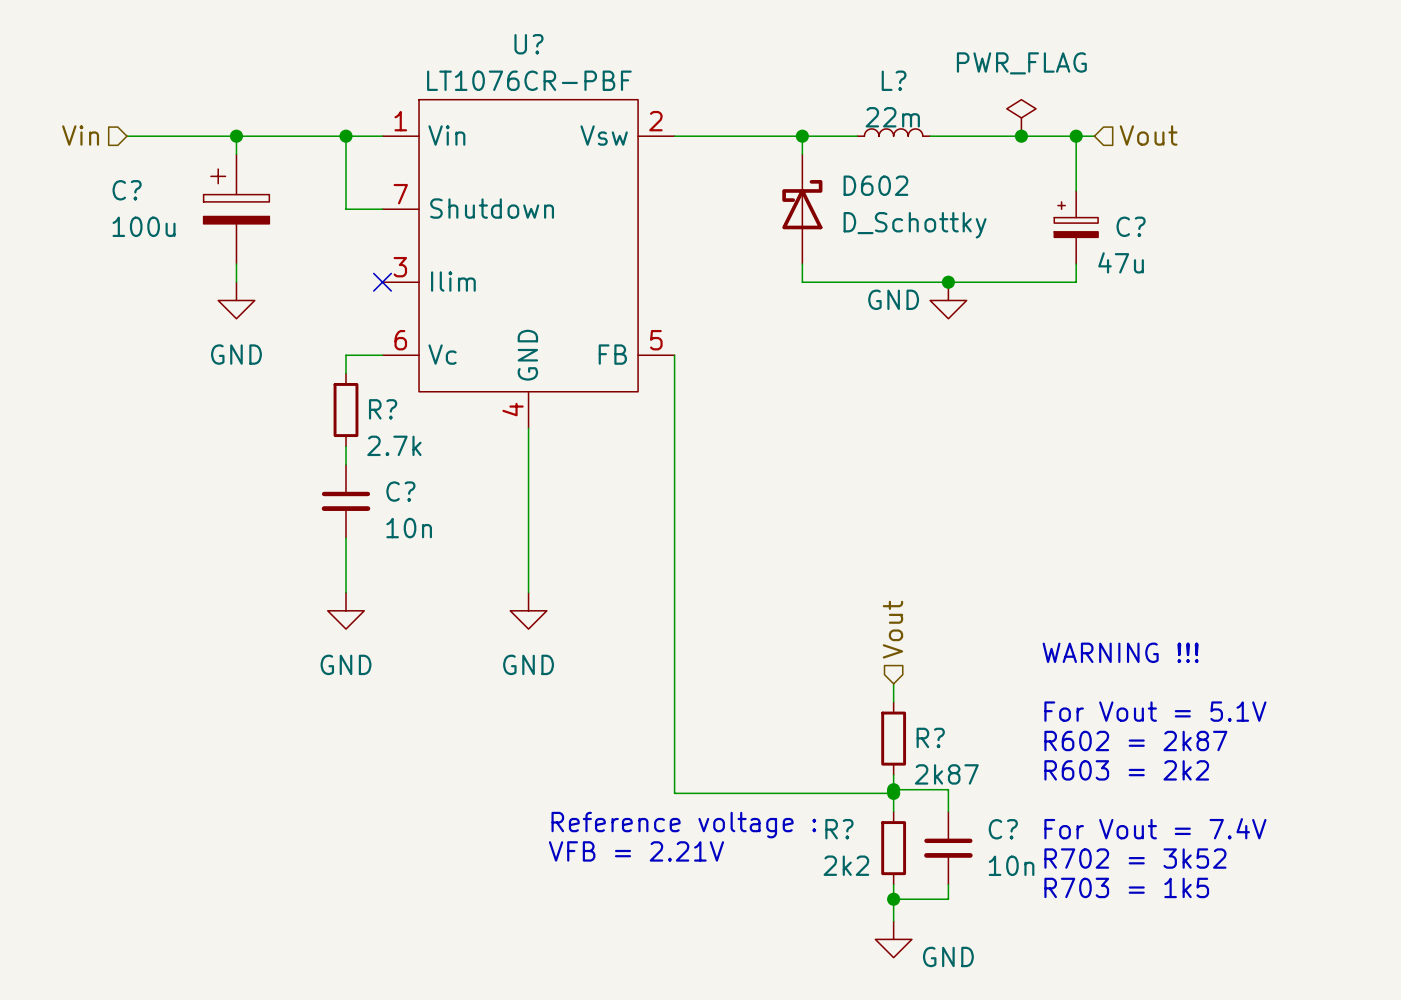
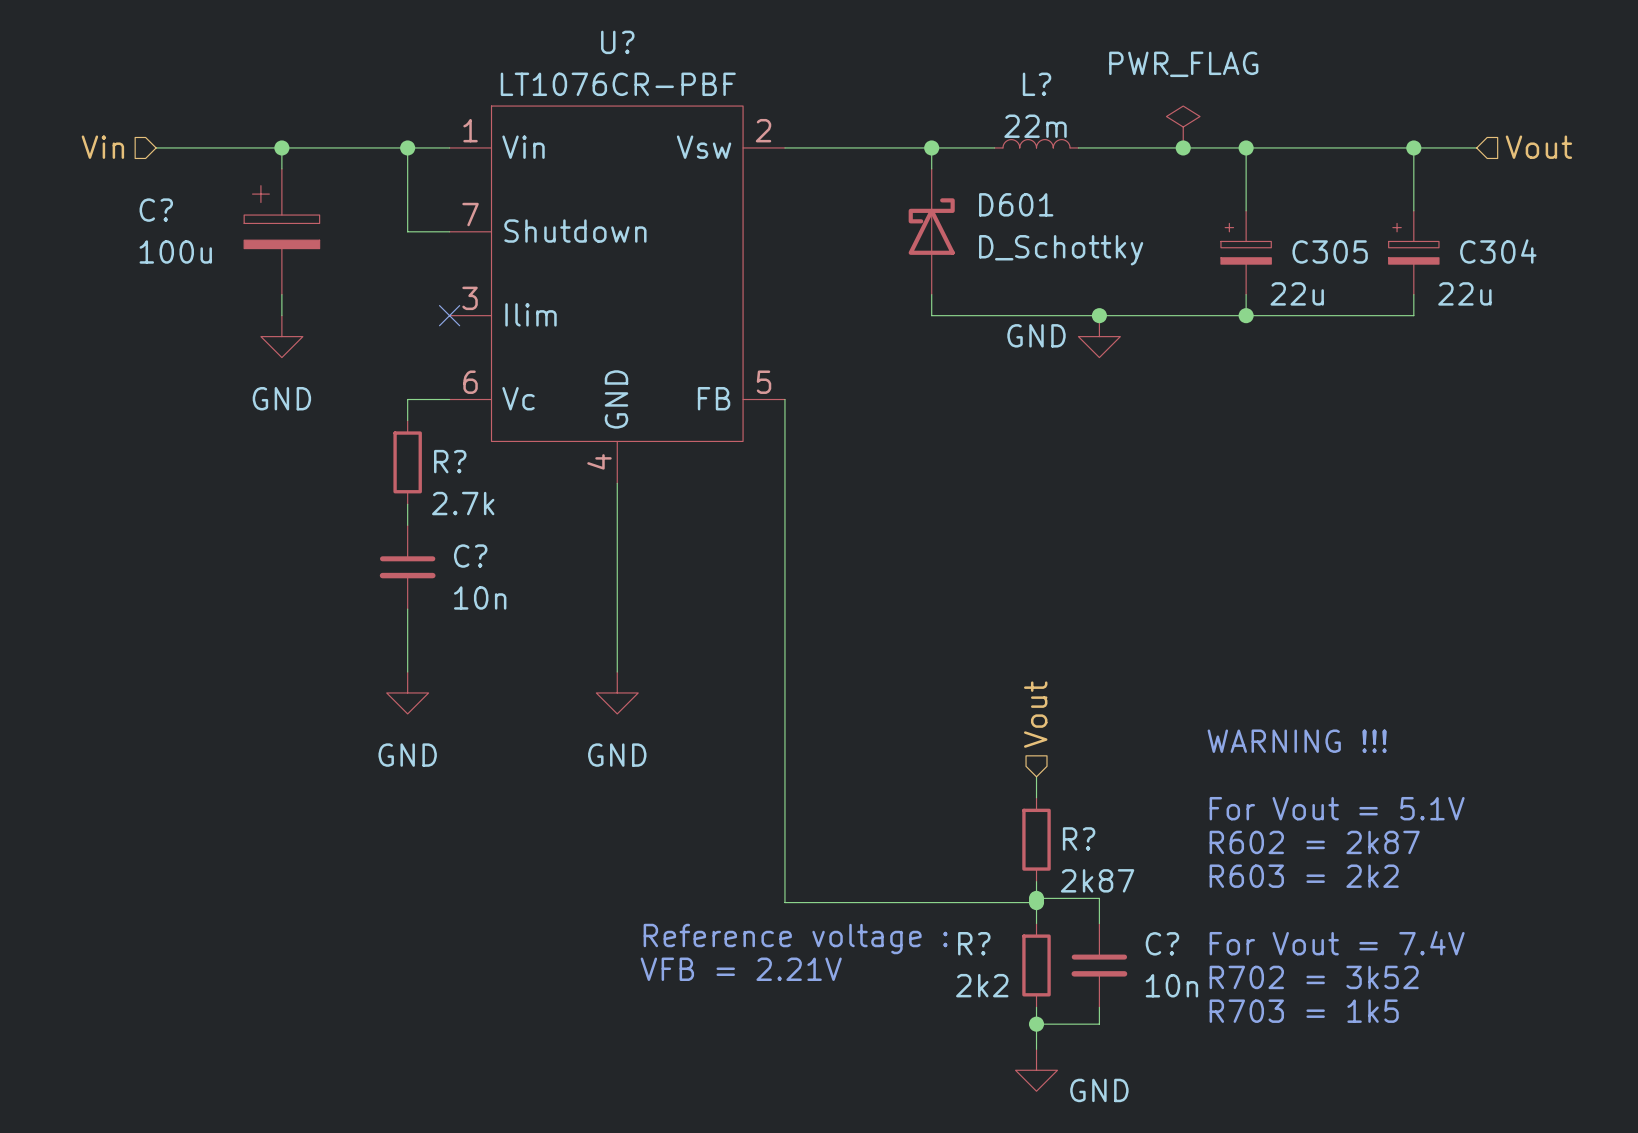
hierarchical label position: Vout (1148, 135) -> Vout (1538, 147)
wire: none -> (1267, 147) (1476, 147)
wire: none -> (1413, 147) (1413, 210)
junction: none -> (1413, 147)
D602 name: D602 (875, 185) -> D601 (1016, 204)
C? name: C? (1131, 226) -> C305 (1330, 251)
C304: none -> 22u (1413, 252)
C? value: 47u (1121, 262) -> 22u (1297, 293)
wire: none -> (1413, 294) (1413, 315) (1246, 315)
junction: none -> (1246, 315)

